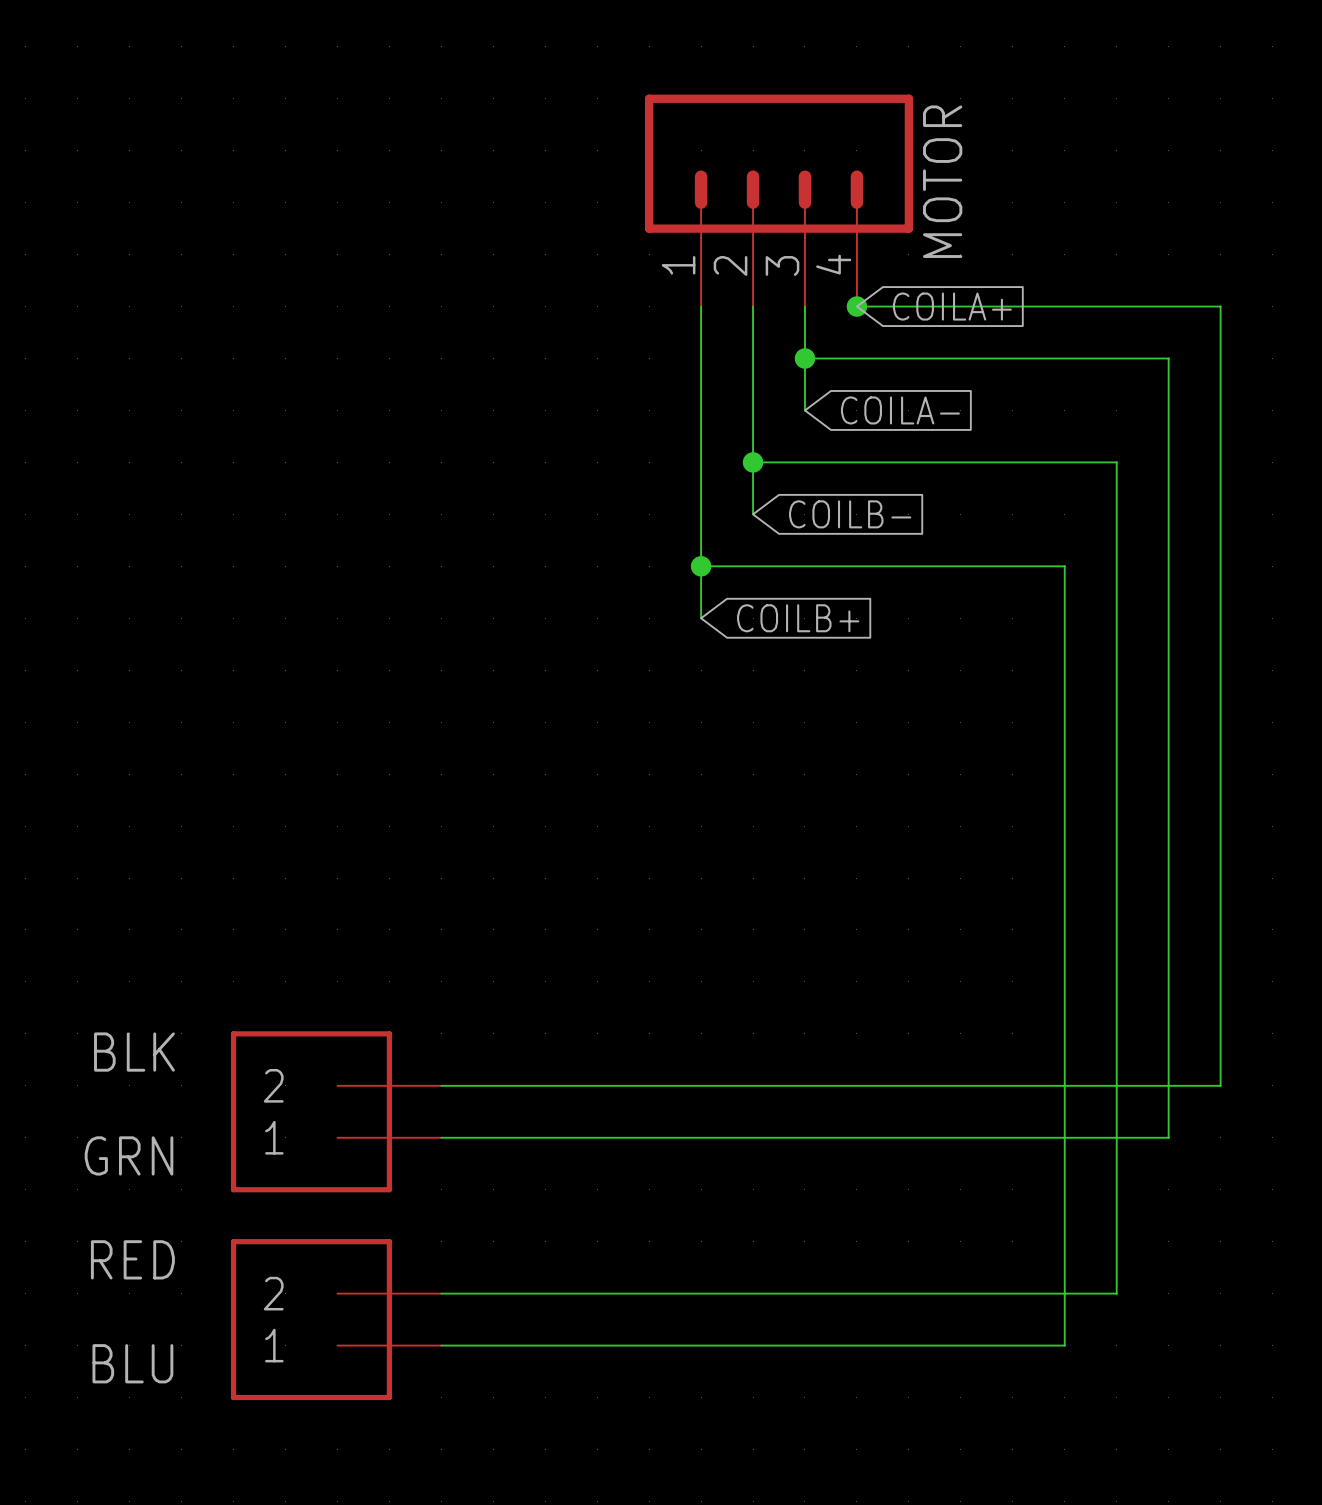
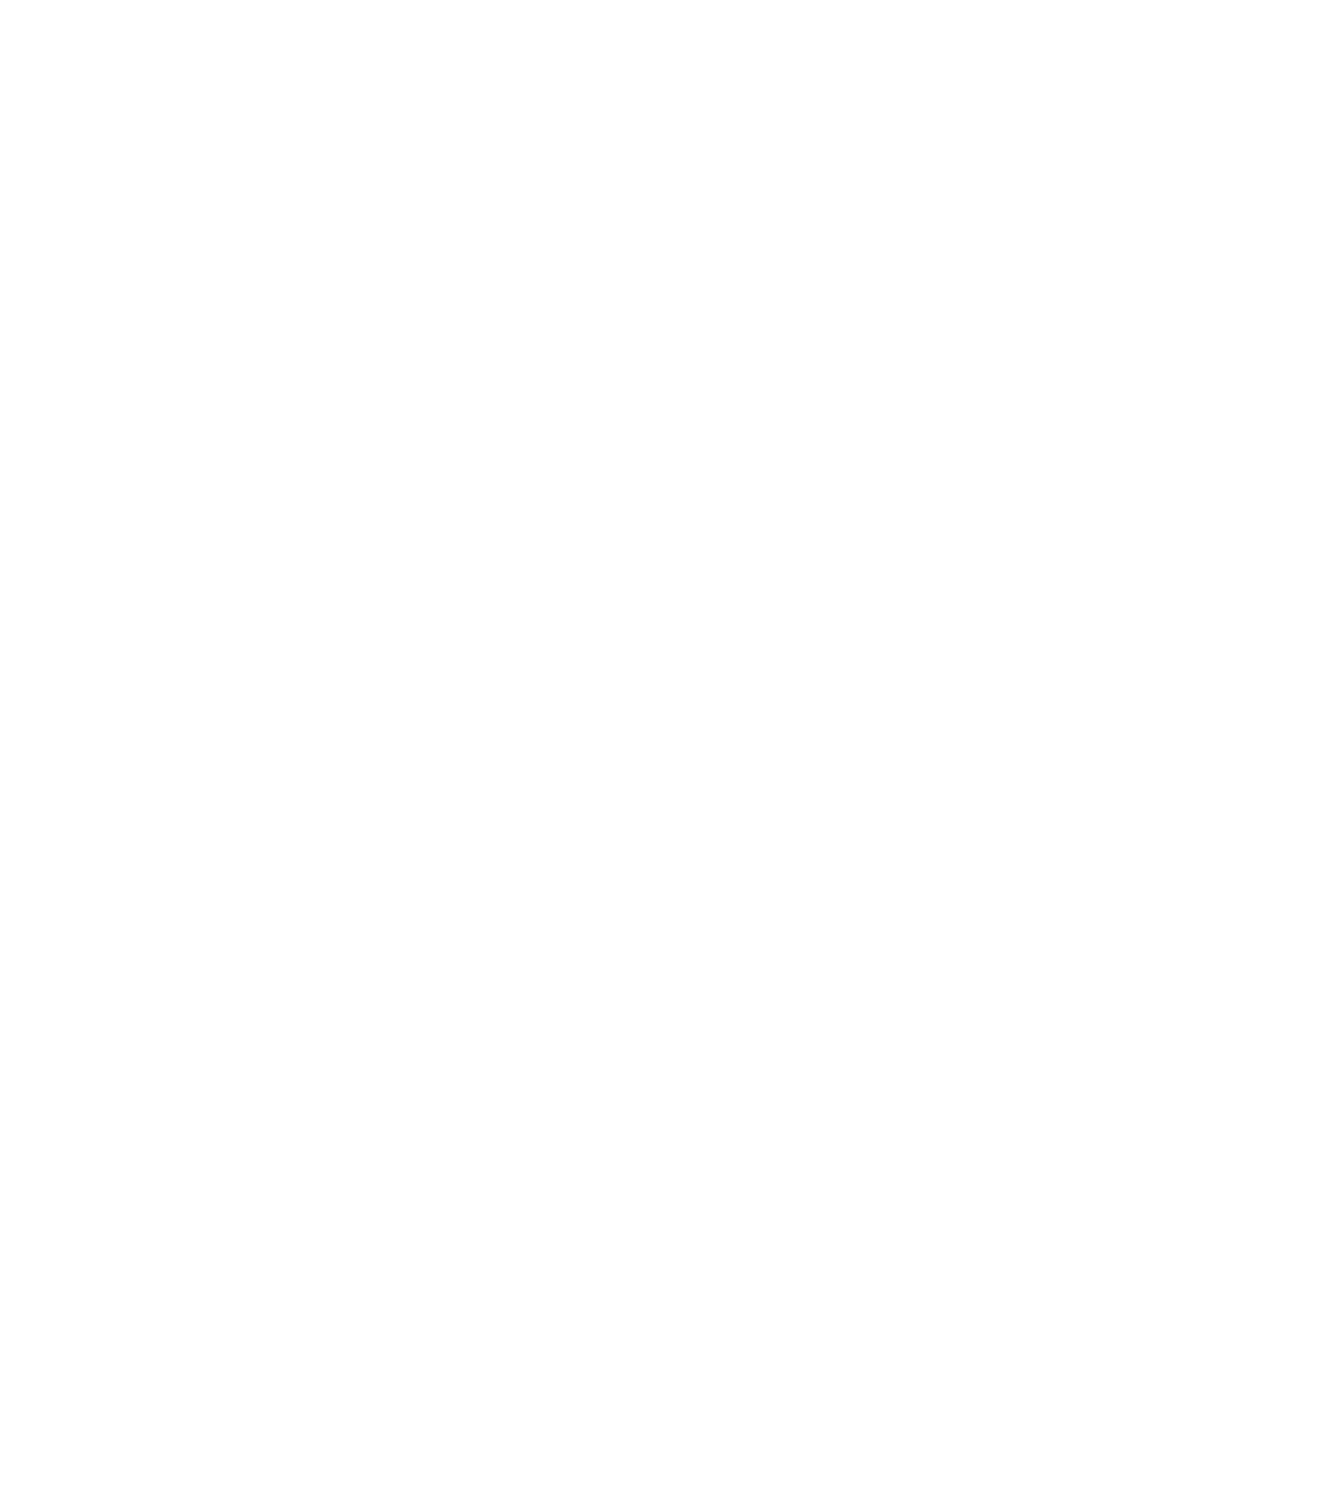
MOTOR: (779, 200) -> none
wire: (701, 306) (701, 618) -> none
wire: (753, 306) (753, 514) -> none
wire: (804, 306) (804, 410) -> none
wire: (856, 306) (1220, 306) (1220, 1085) (441, 1085) -> none
junction: (856, 306) -> none
global label: COILA+ (952, 306) -> none
wire: (804, 358) (1168, 358) (1168, 1137) (441, 1137) -> none
junction: (804, 358) -> none
global label: COILA- (900, 410) -> none
wire: (753, 462) (1116, 462) (1116, 1293) (441, 1293) -> none
junction: (753, 462) -> none
global label: COILB- (850, 514) -> none
wire: (701, 566) (1064, 566) (1064, 1345) (441, 1345) -> none
junction: (701, 566) -> none
global label: COILB+ (798, 618) -> none
part: (336, 1111) -> none
part: (336, 1319) -> none

